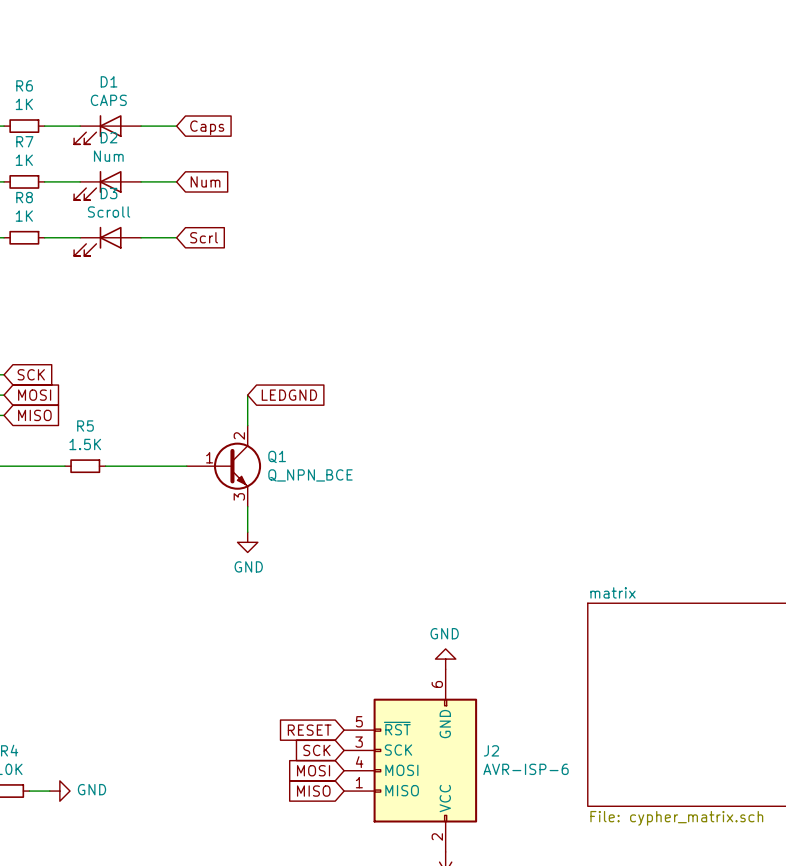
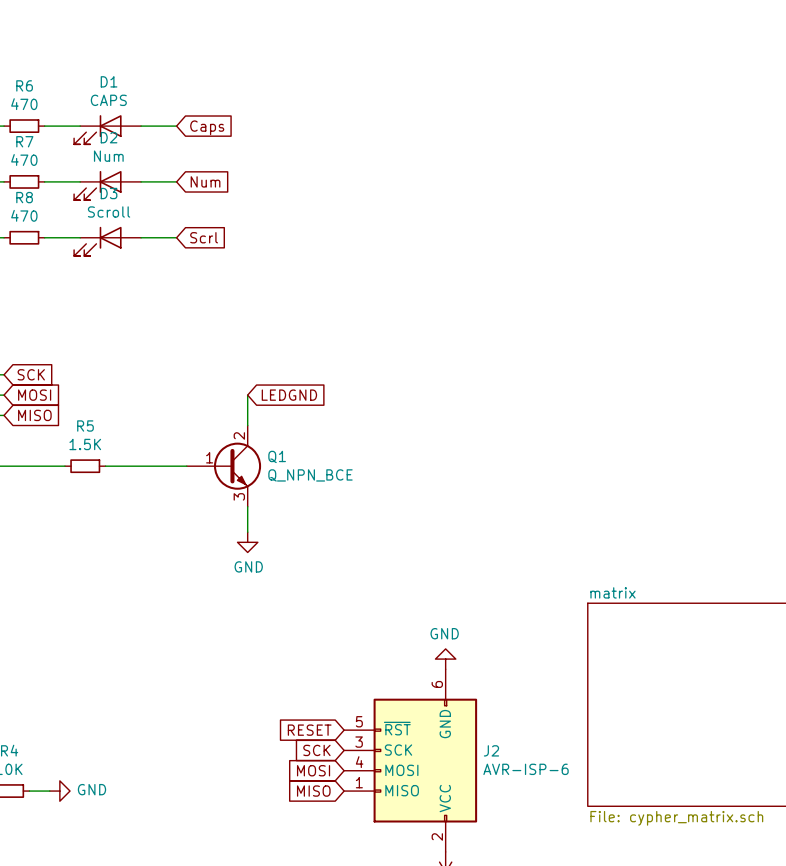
R6 value: 1K (24, 104) -> 470 (24, 104)
R7 value: 1K (24, 160) -> 470 (24, 159)
R8 value: 1K (24, 216) -> 470 (24, 215)

